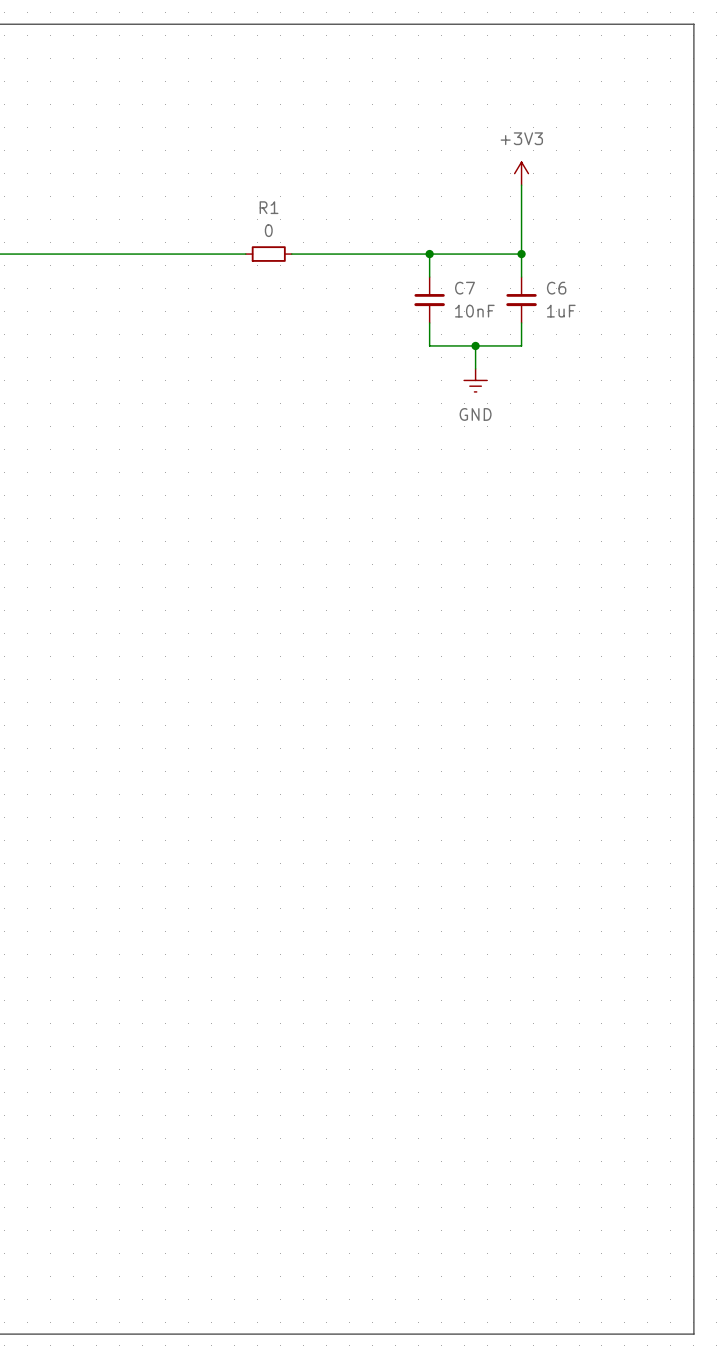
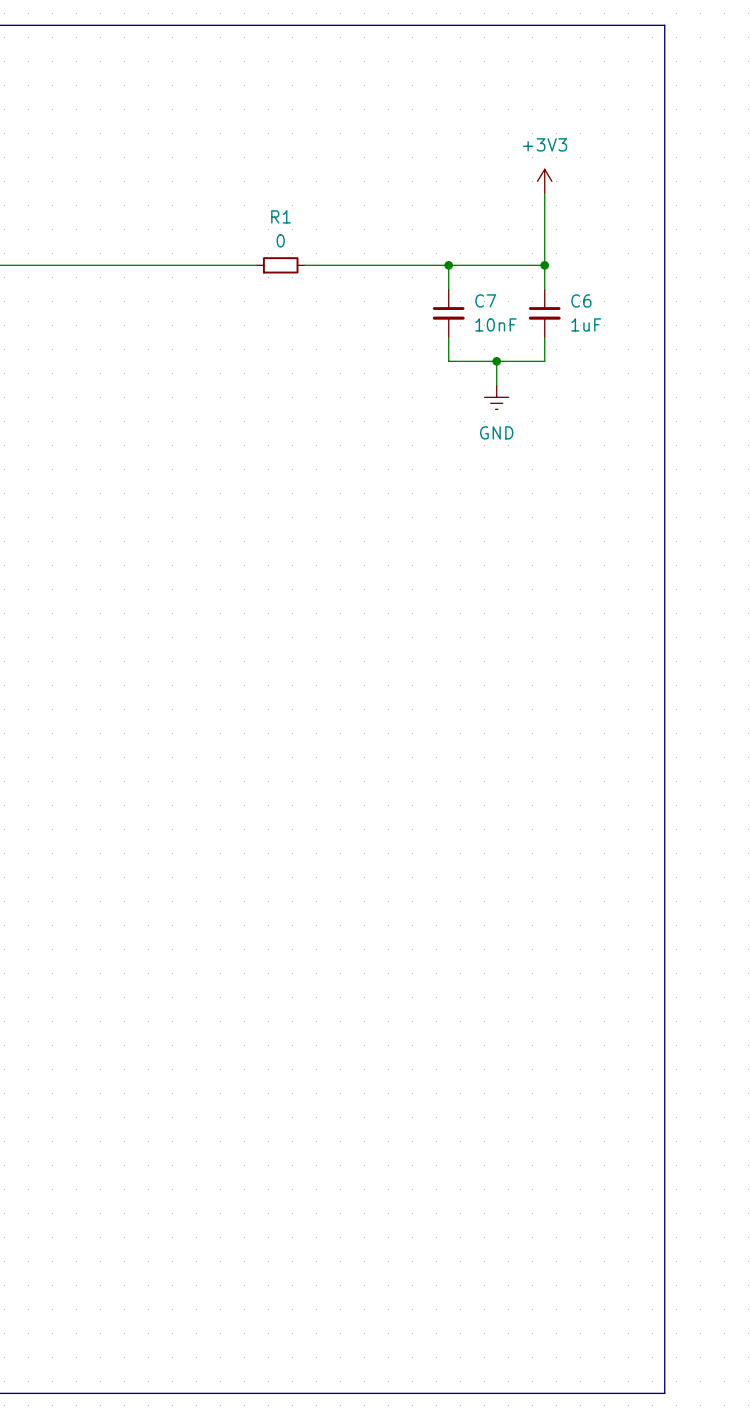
line: (636, 24) (693, 24) (693, 1334) (636, 1334) -> (664, 25) (664, 1393)

